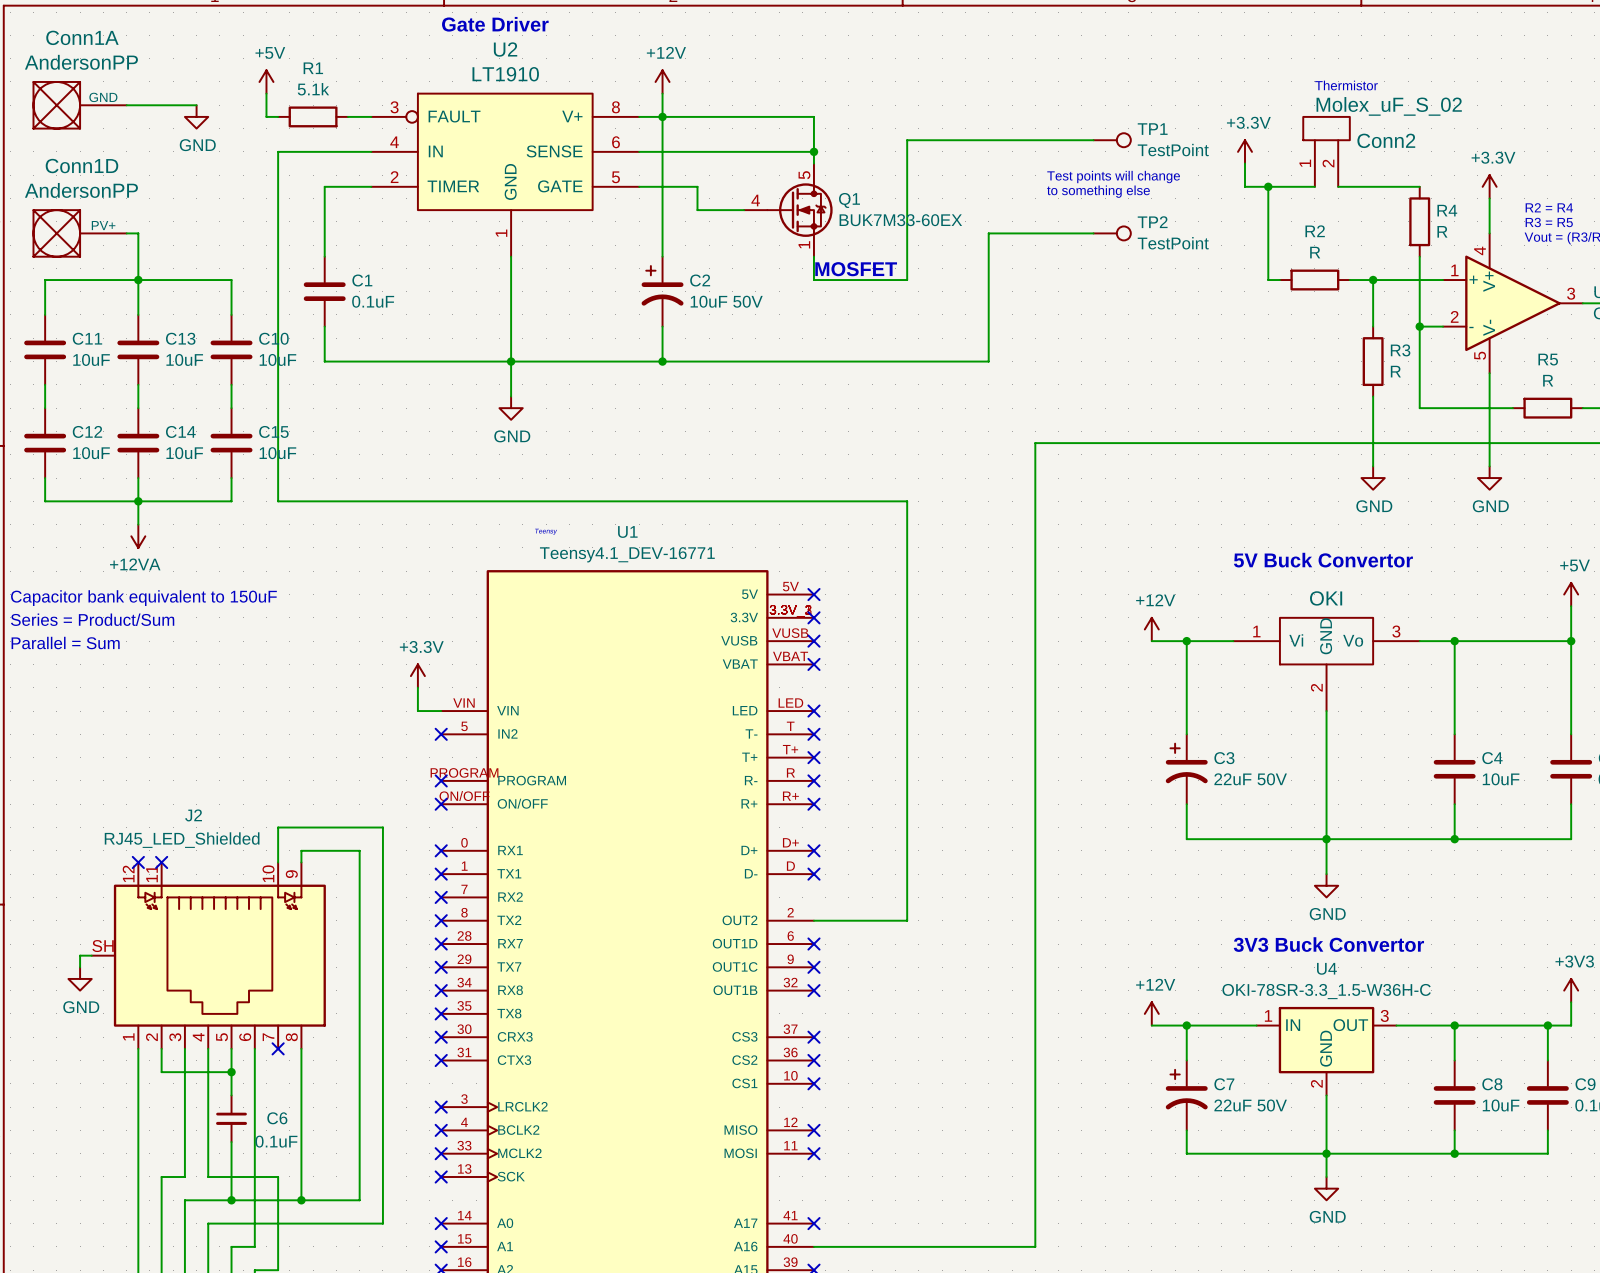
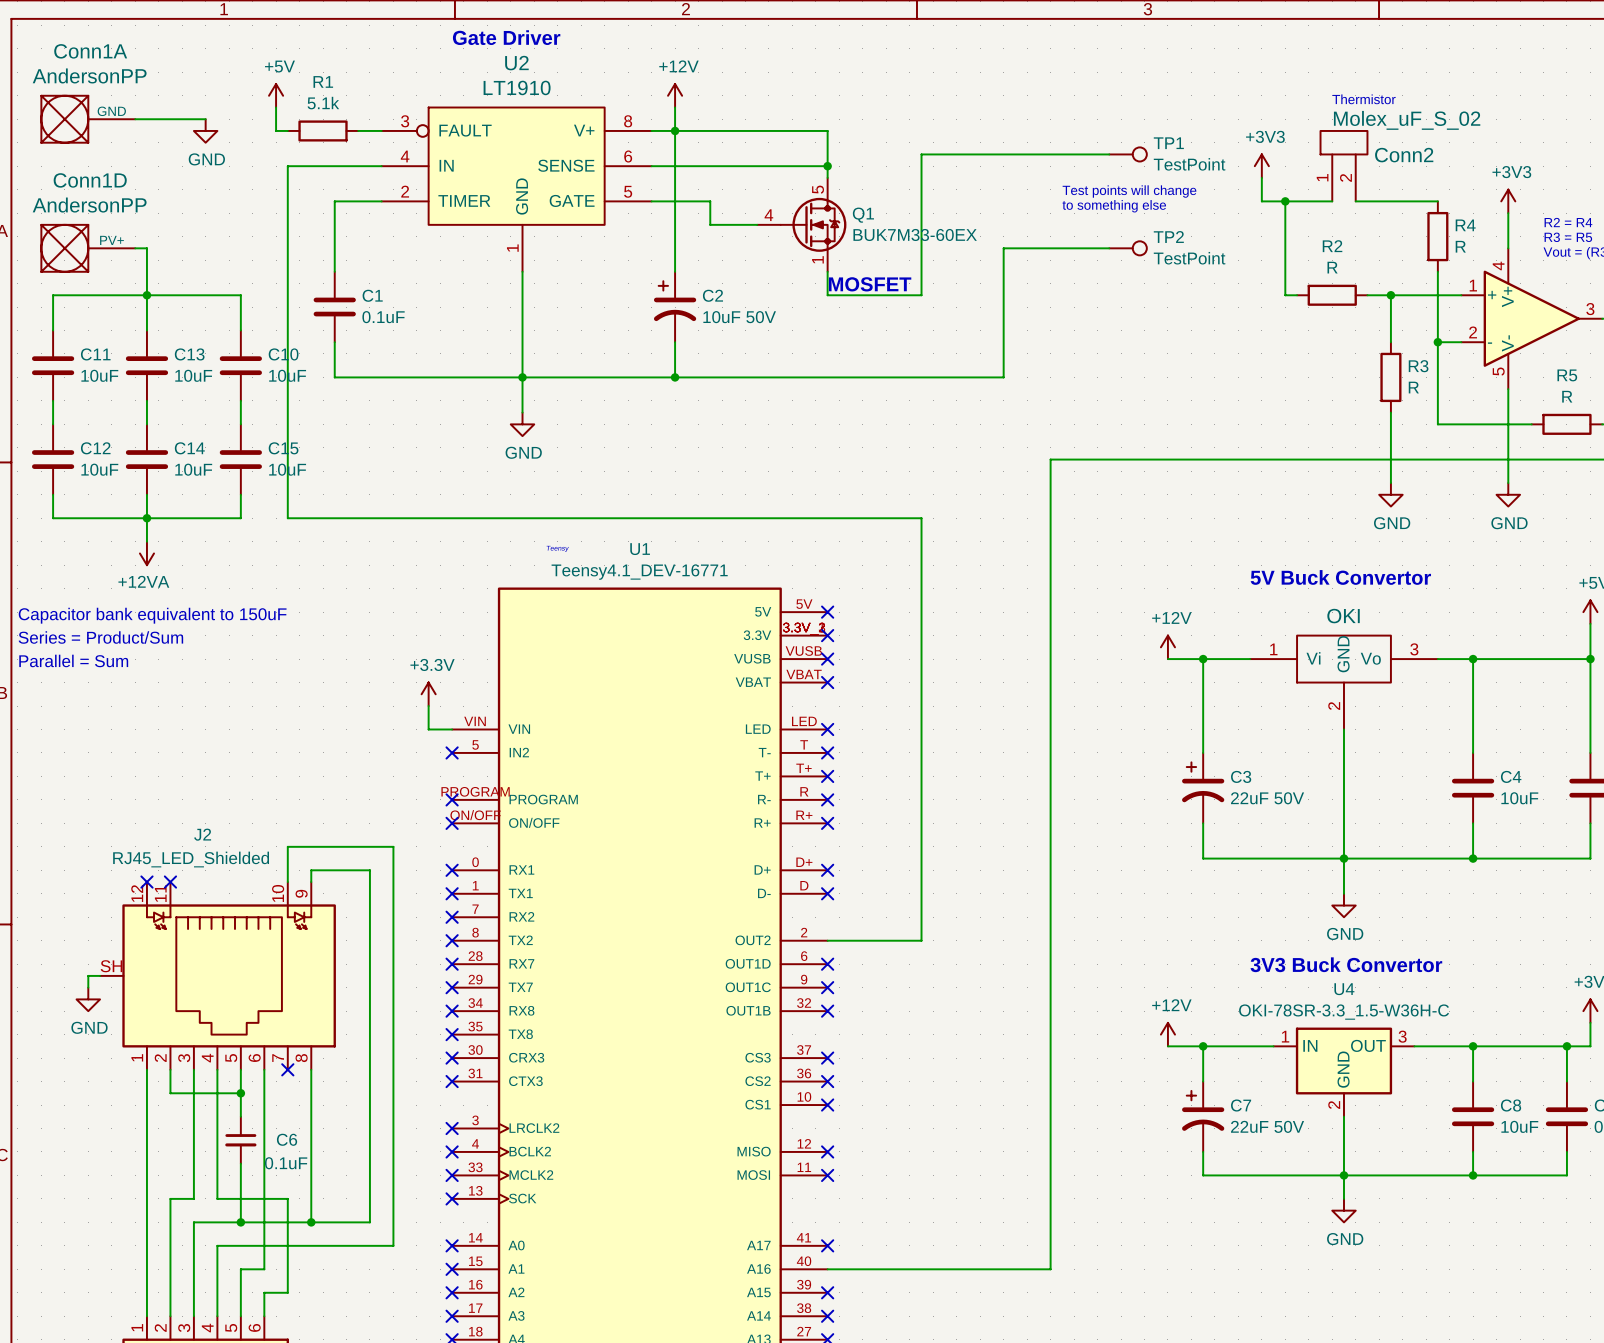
power symbol: +3.3V (1244, 151) -> +3V3 (1261, 166)
power symbol: +3.3V (1489, 186) -> +3V3 (1508, 201)

